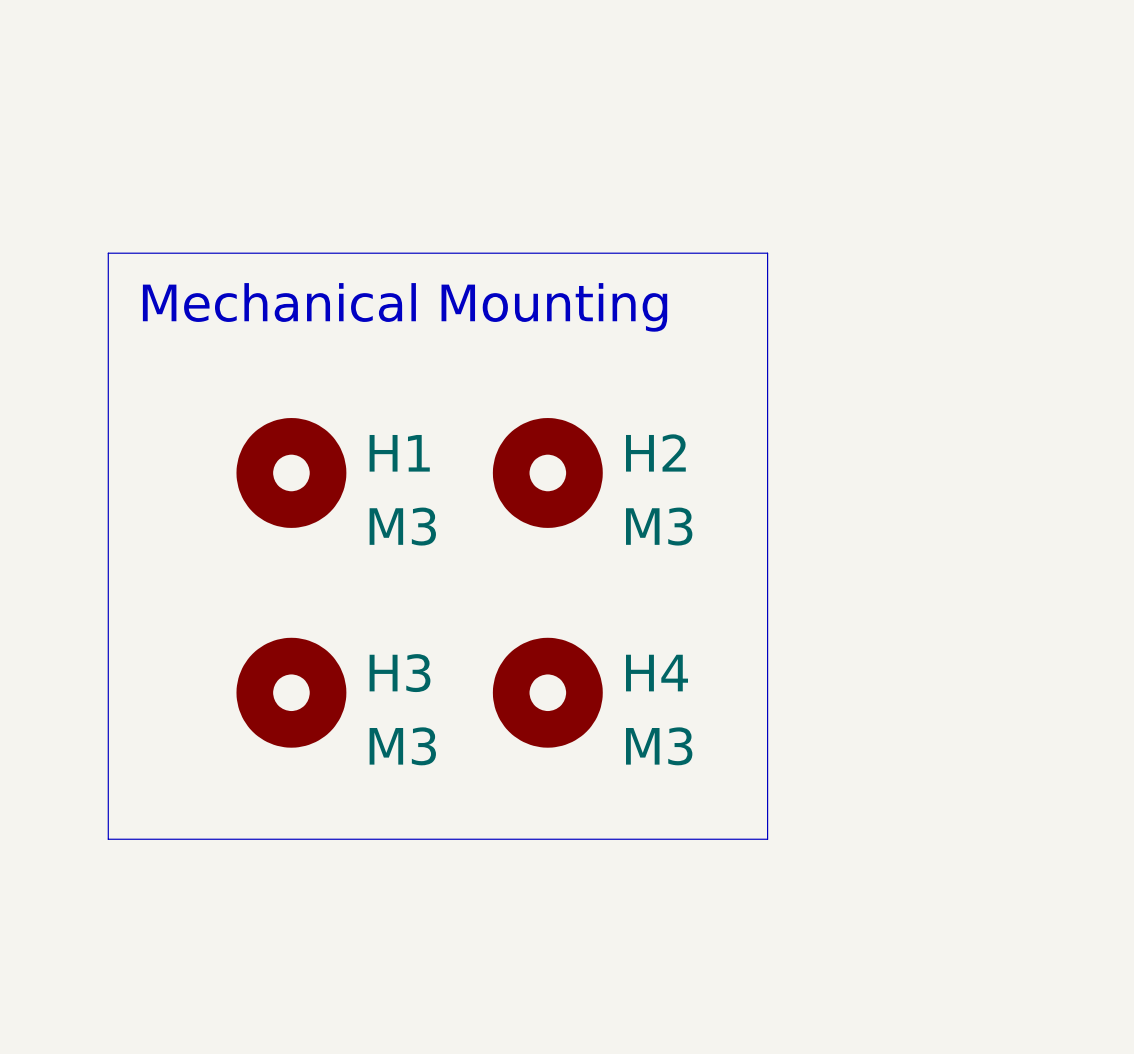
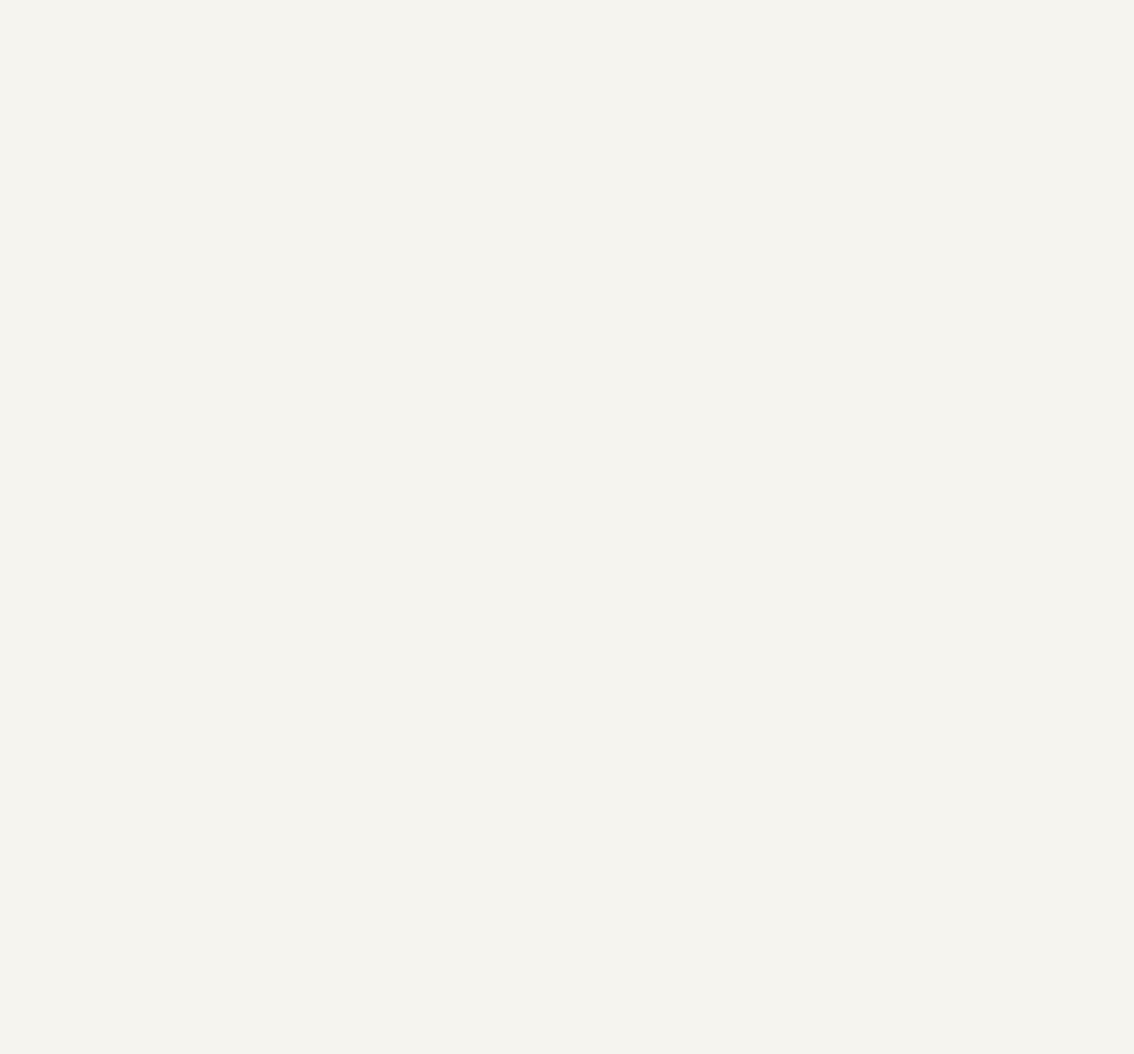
line: (108, 253) (767, 253) (767, 839) (108, 839) (108, 253) -> none
text: Mechanical Mounting (405, 307) -> none
H1: M3 (291, 472) -> none
H2: M3 (547, 472) -> none
H3: M3 (291, 692) -> none
H4: M3 (547, 692) -> none

